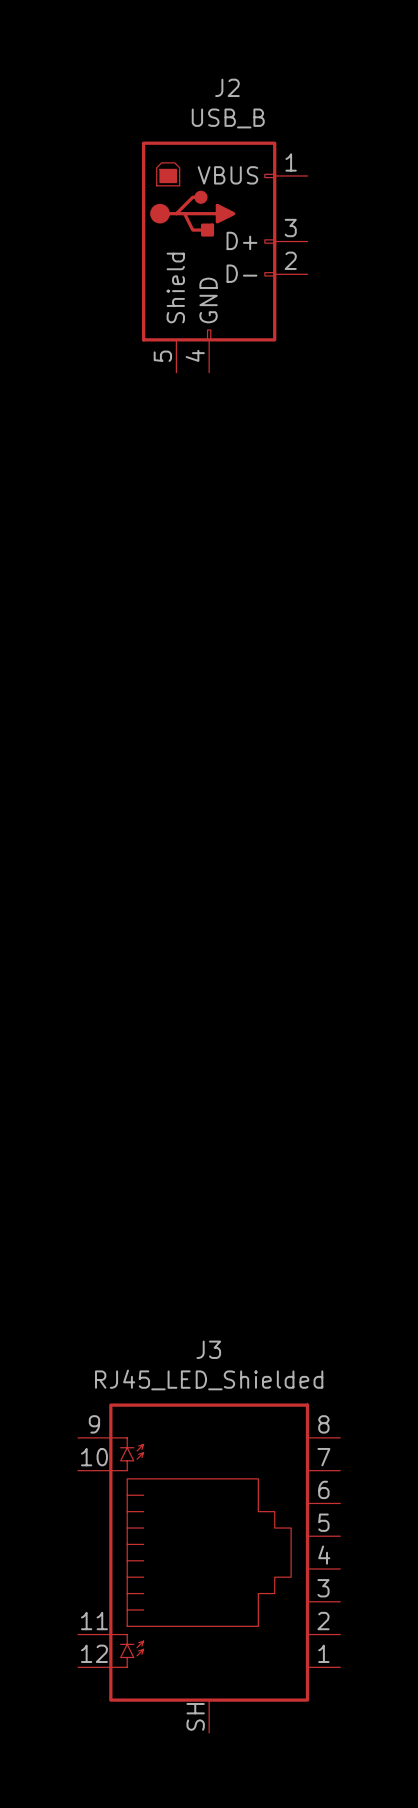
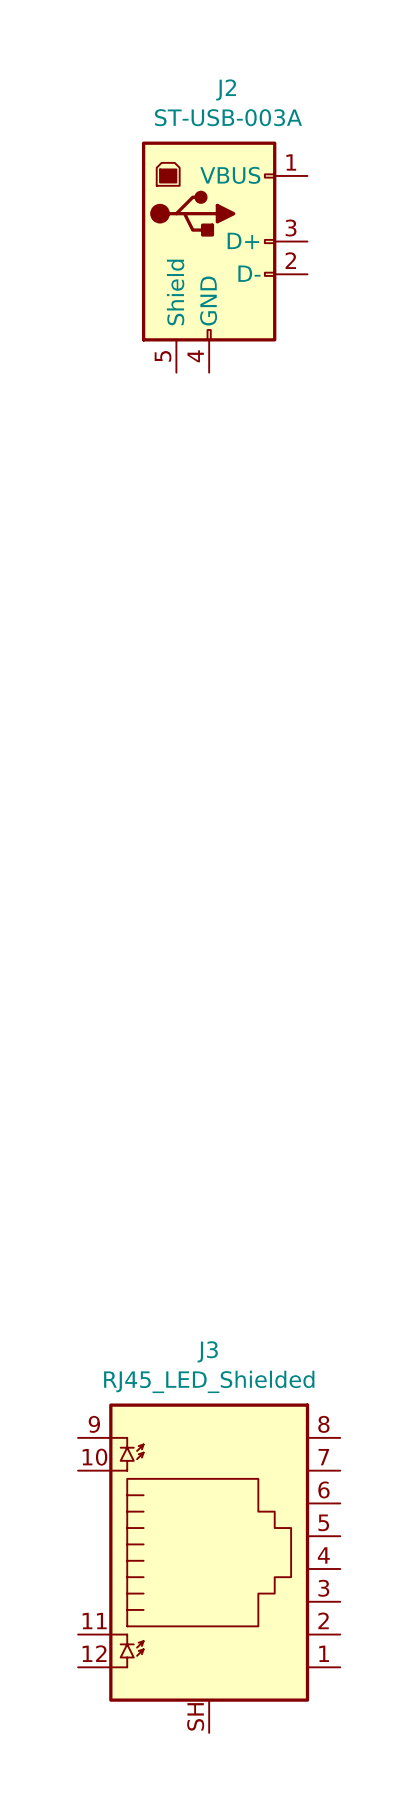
J2 value: USB_B (228, 118) -> ST-USB-003A (228, 117)

